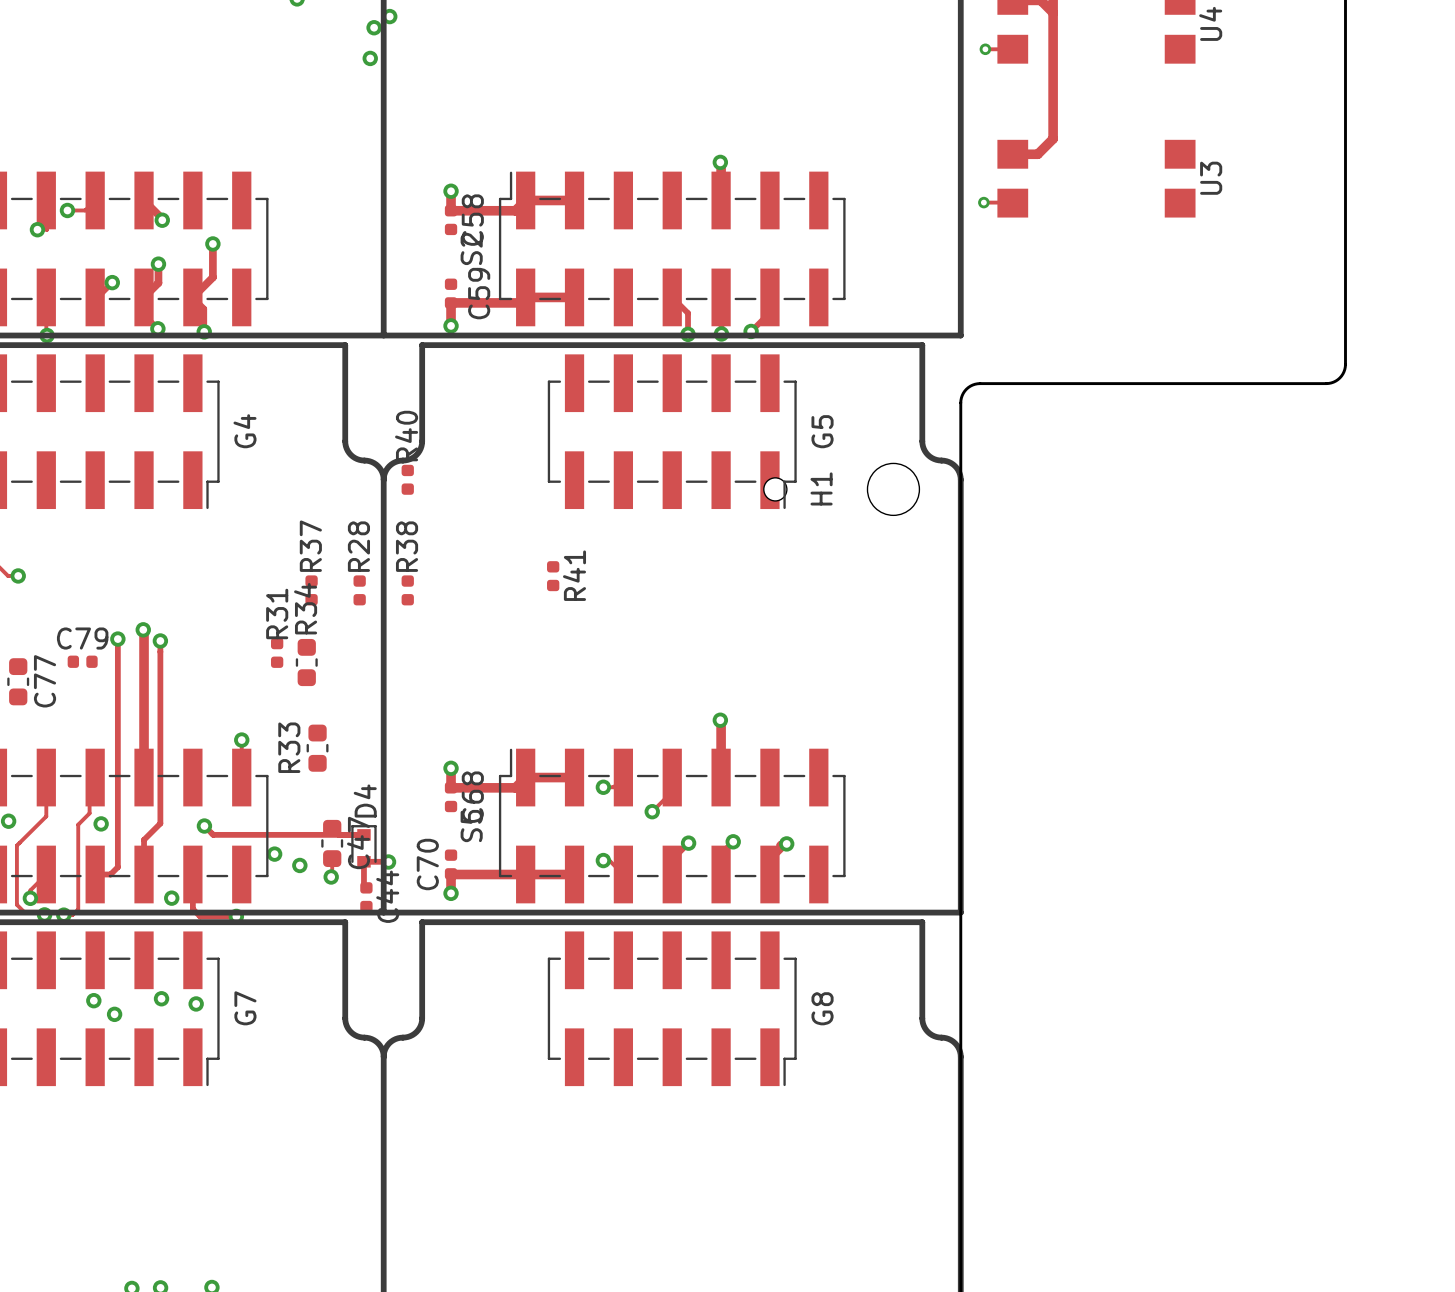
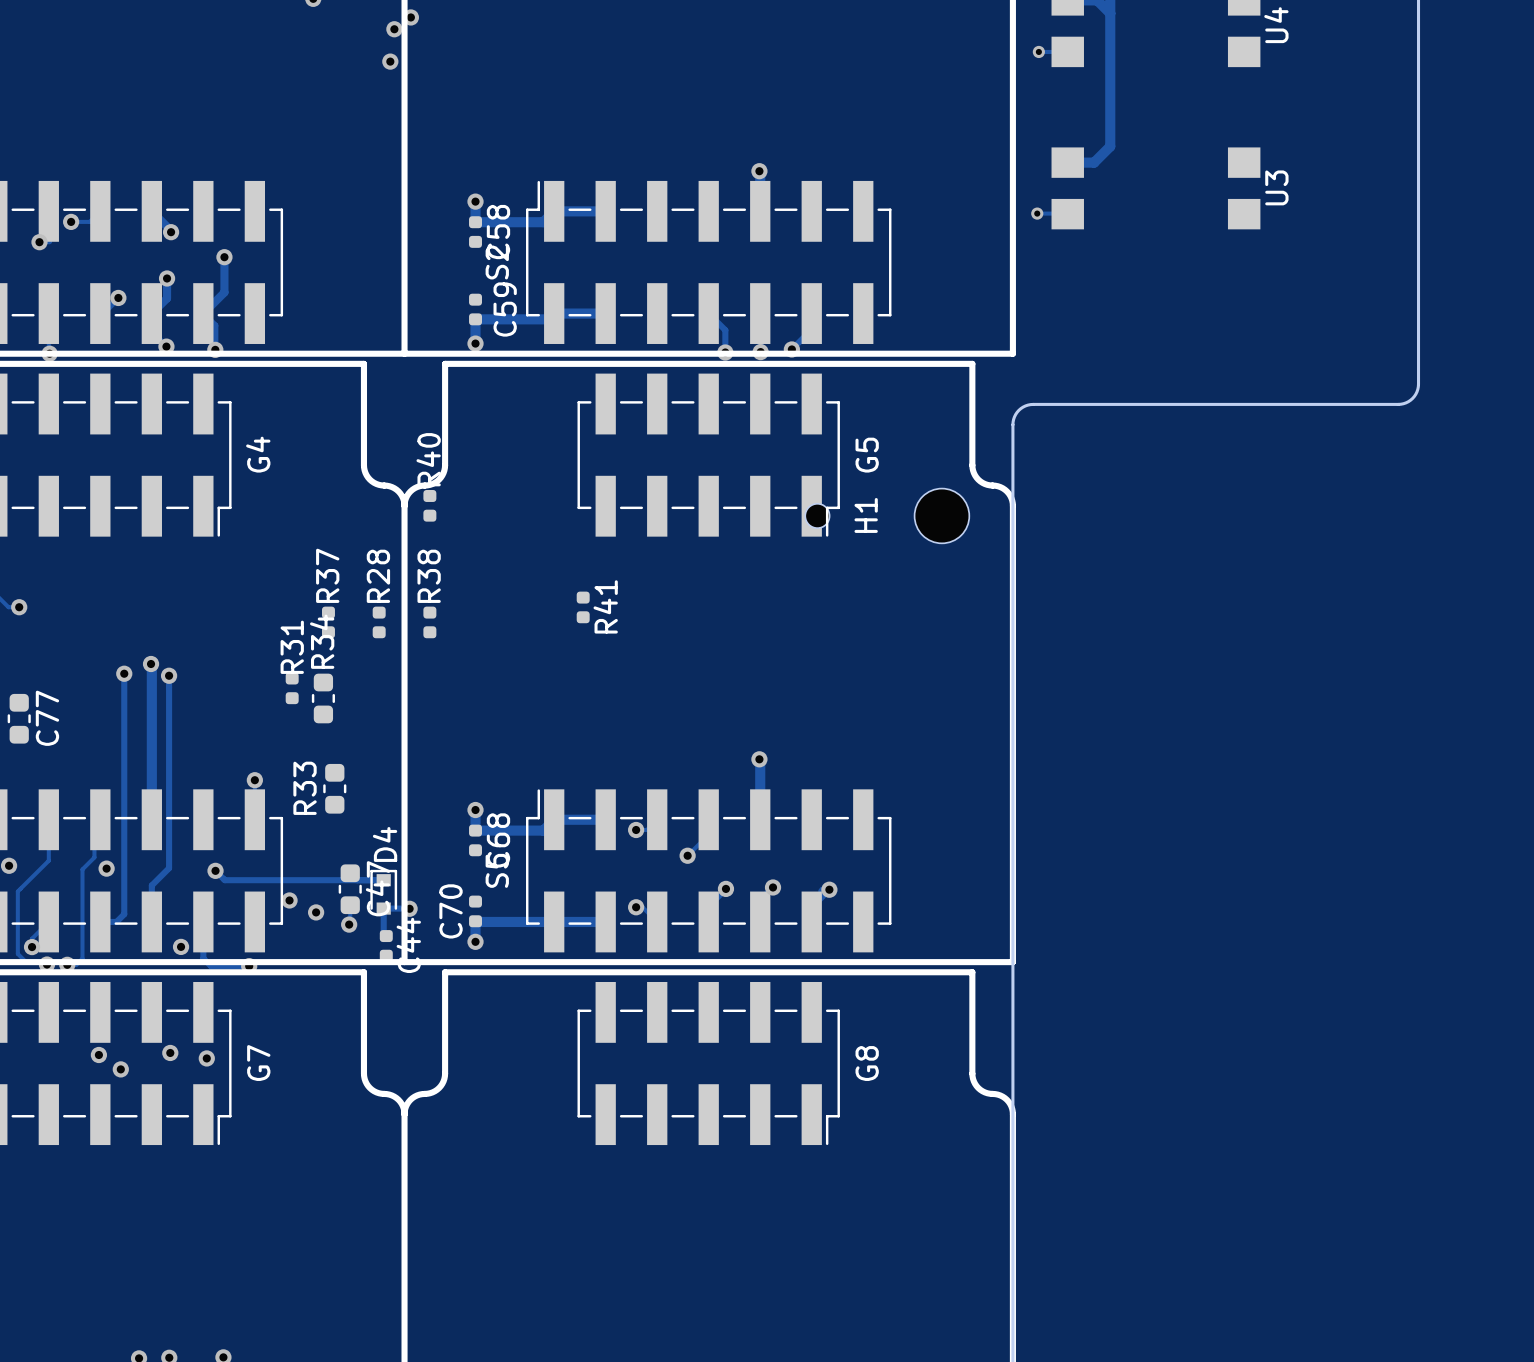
C79: (82, 661) -> none

